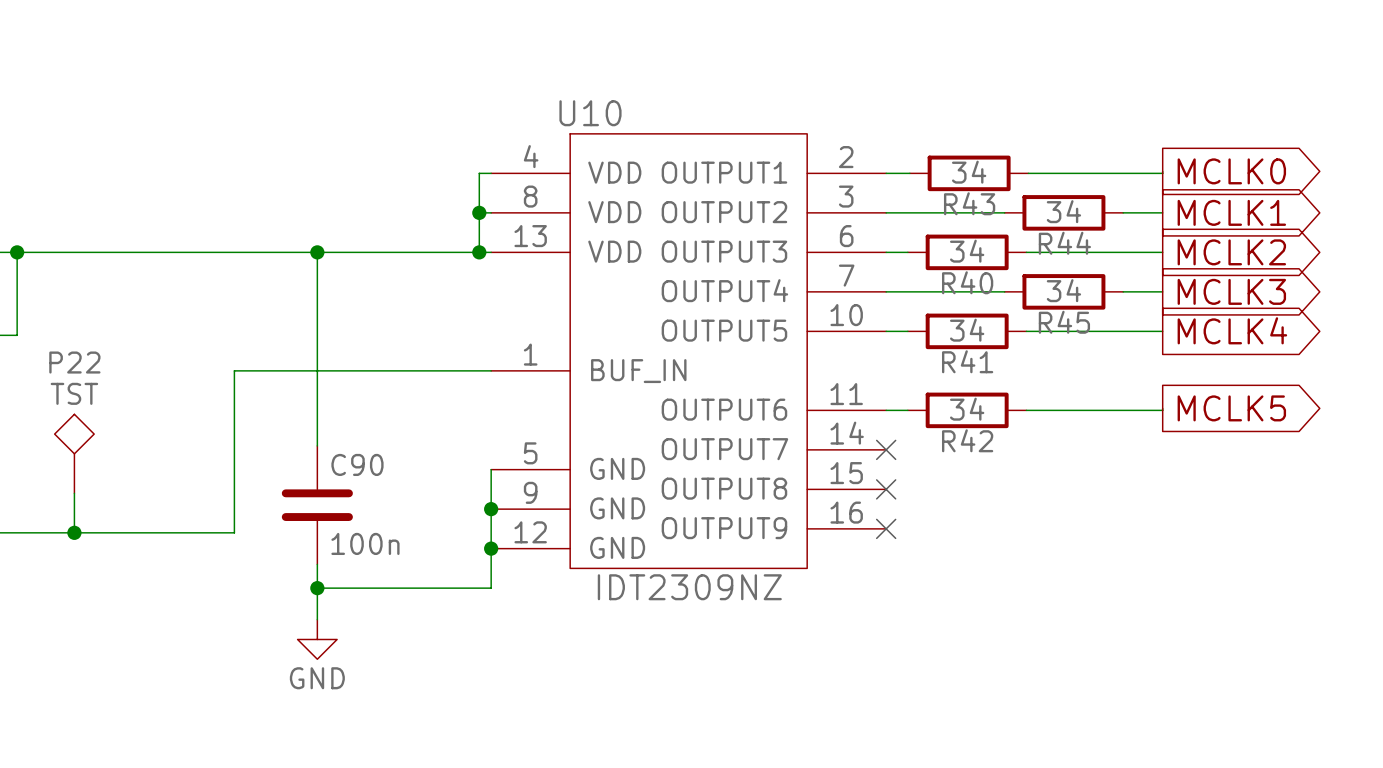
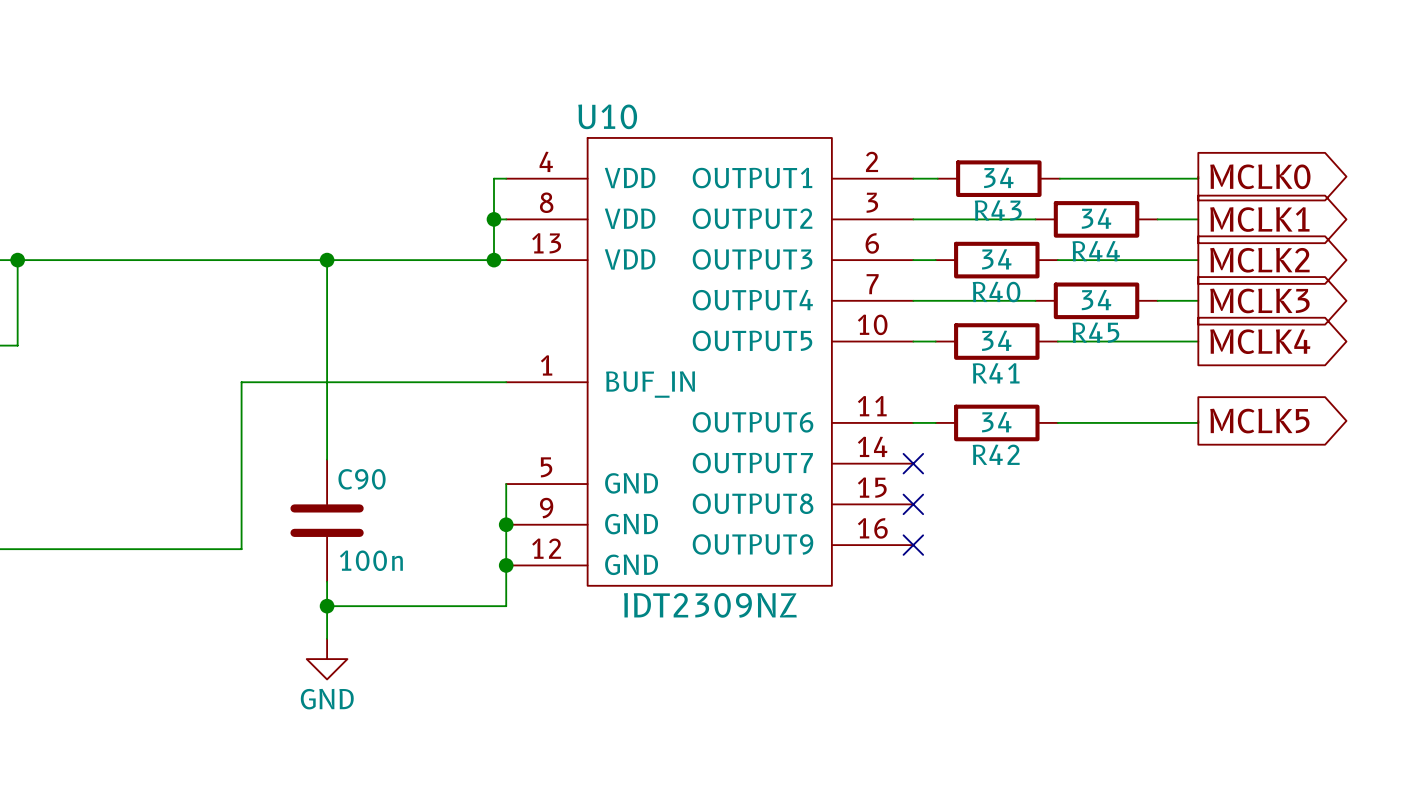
P22: TST (74, 453) -> none
wire: (74, 493) (74, 532) -> none
junction: (74, 532) -> none

